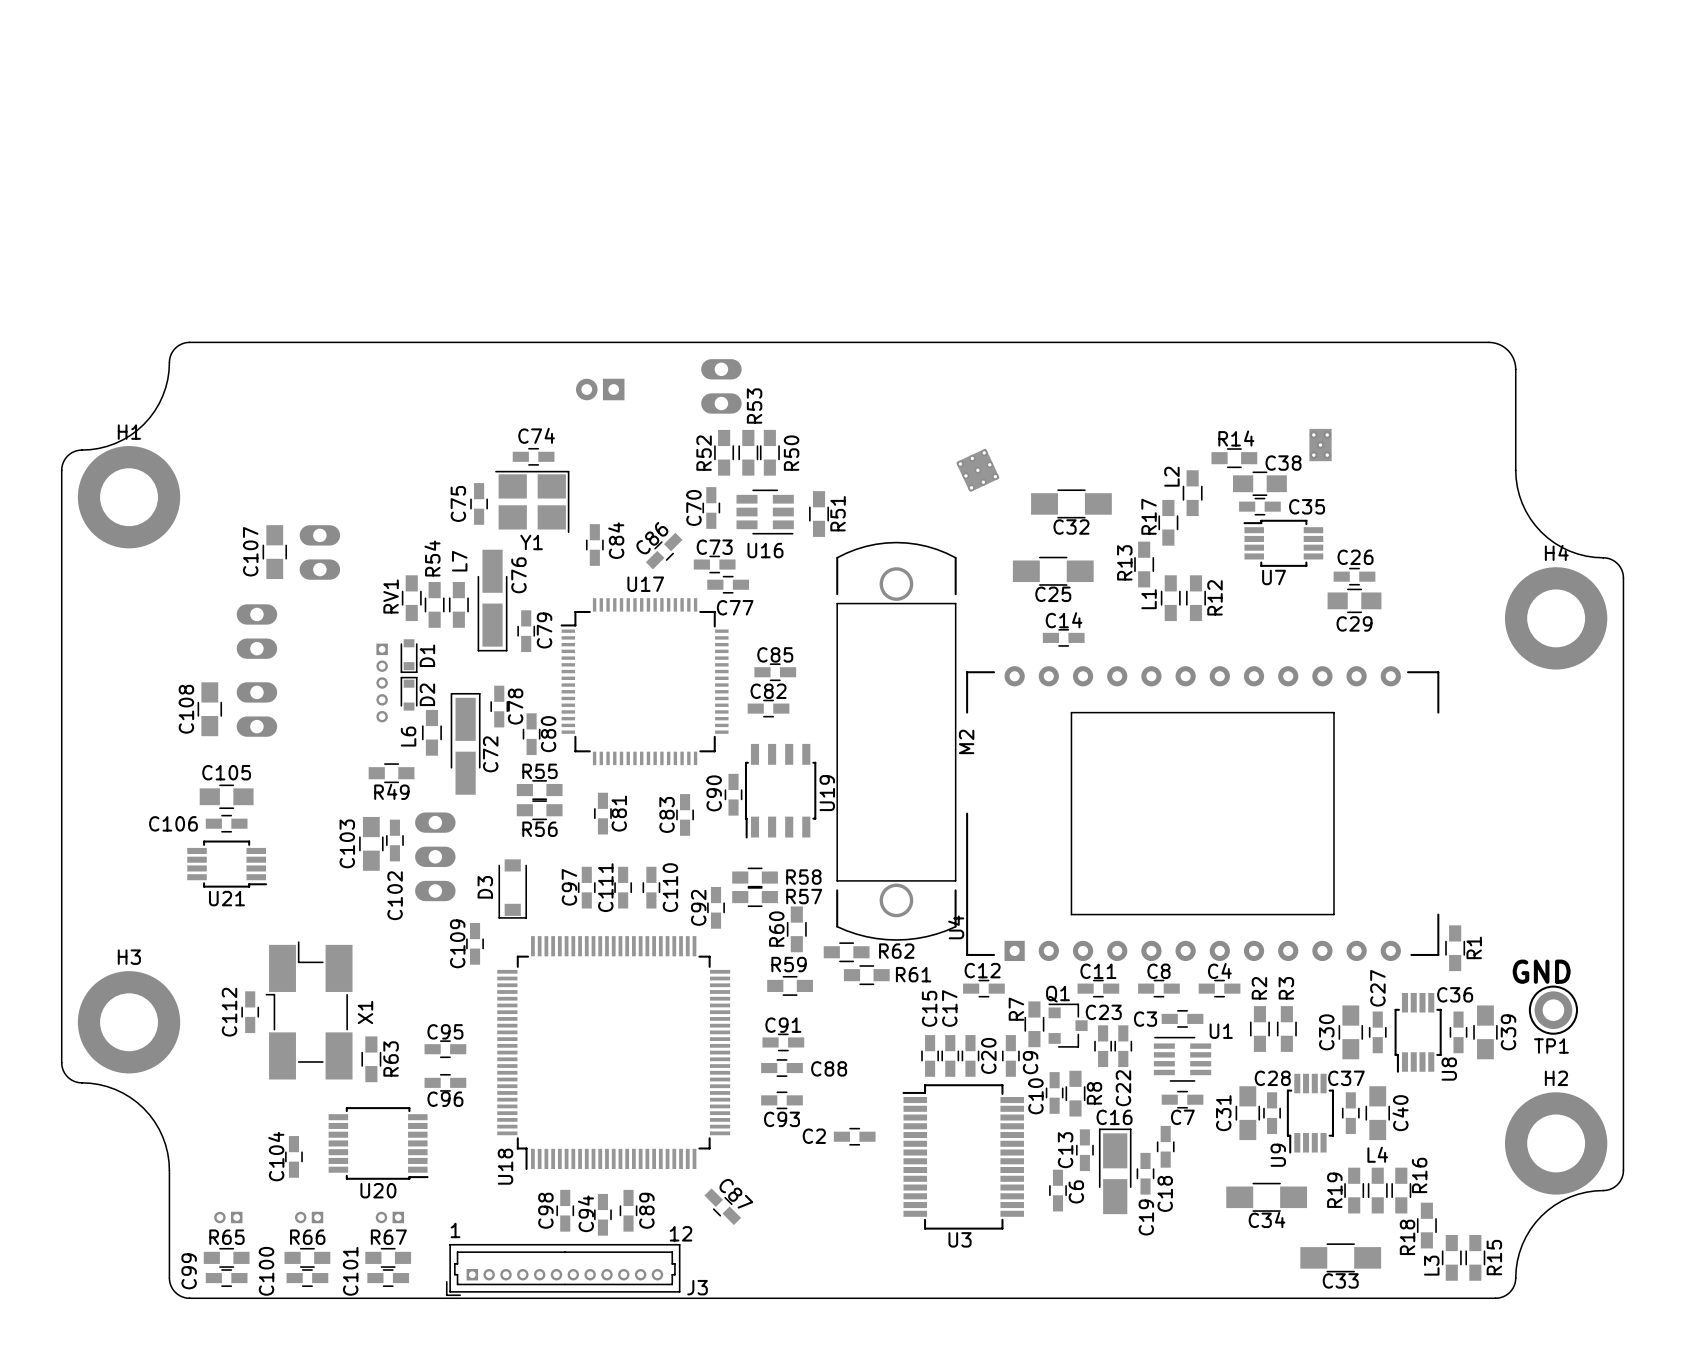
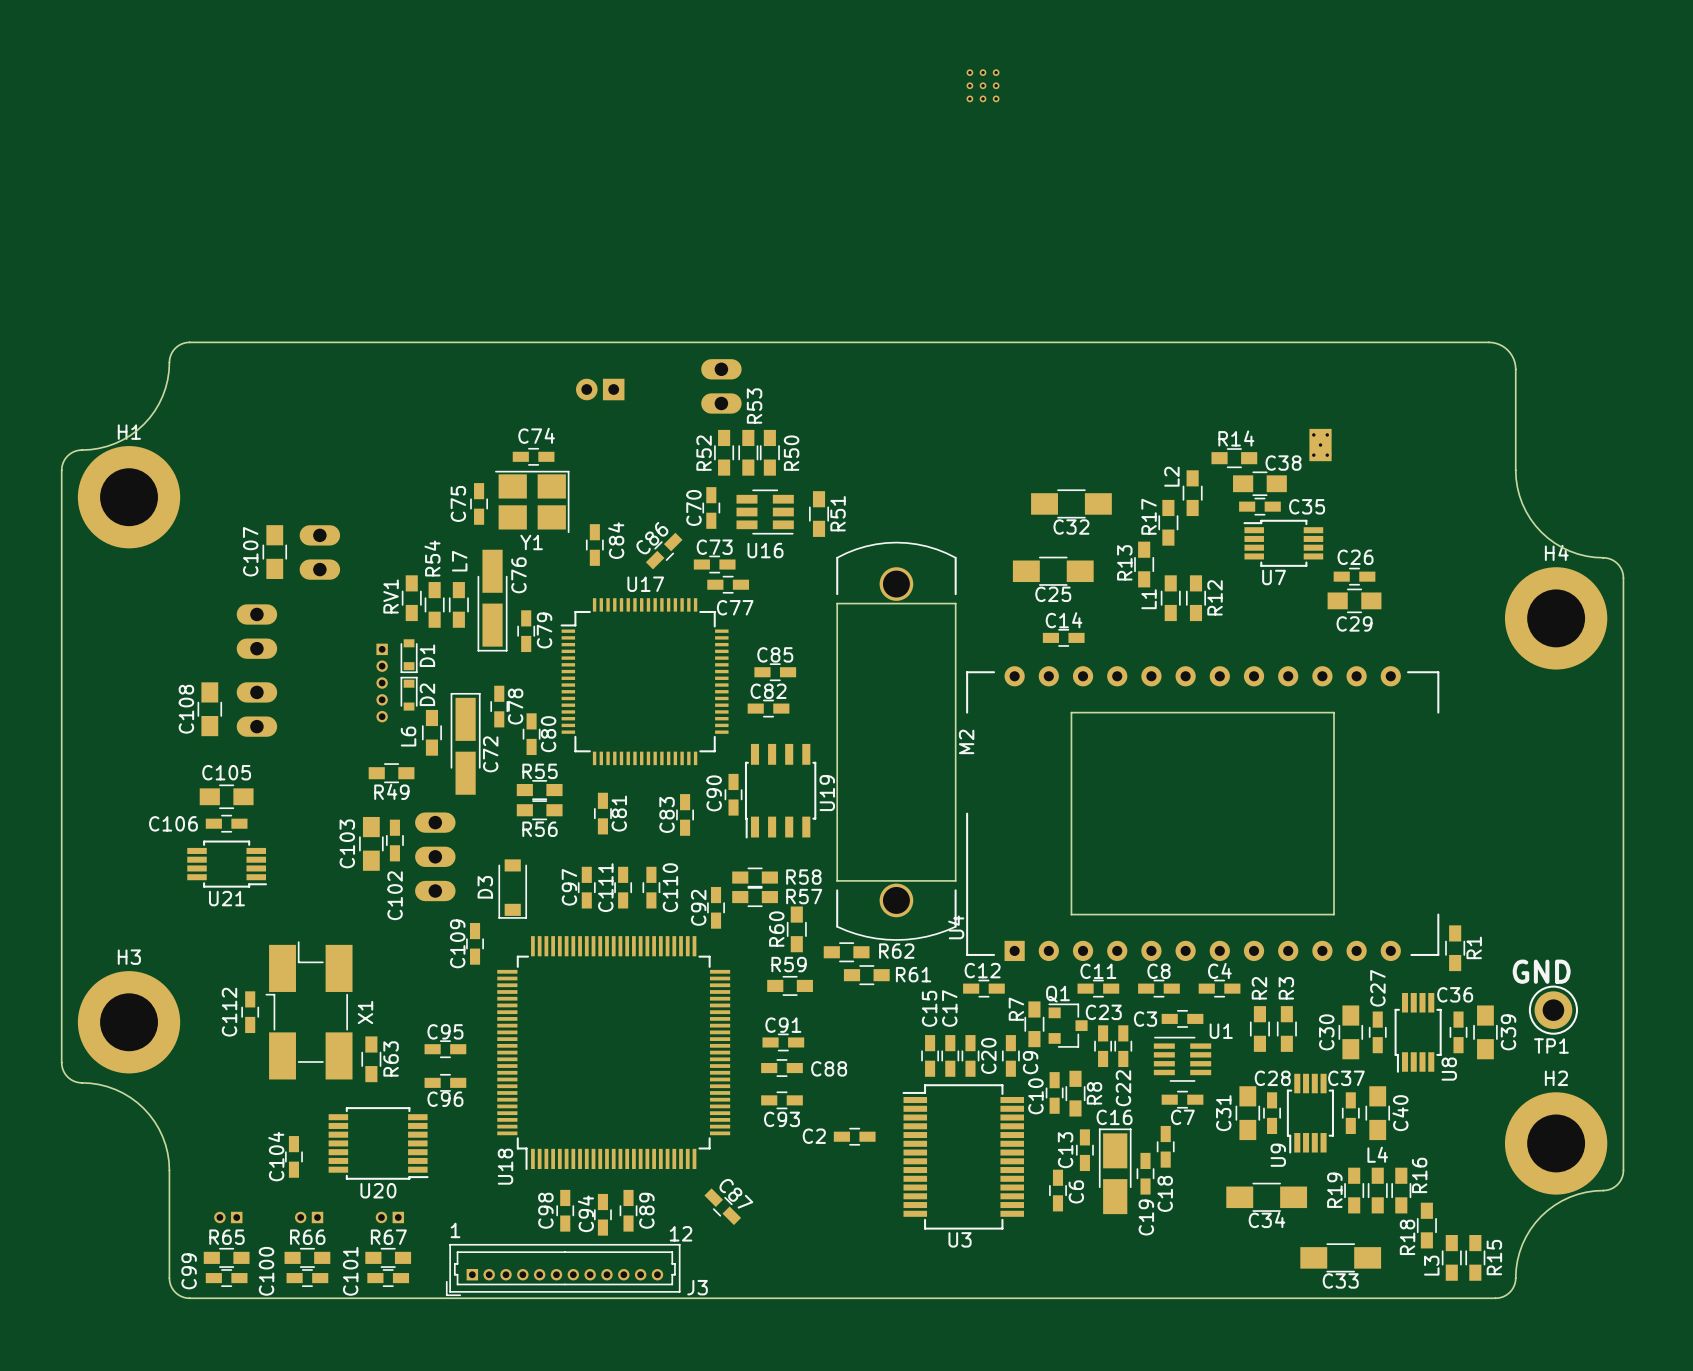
part: none -> (983, 85)
part: (977, 470) -> none

